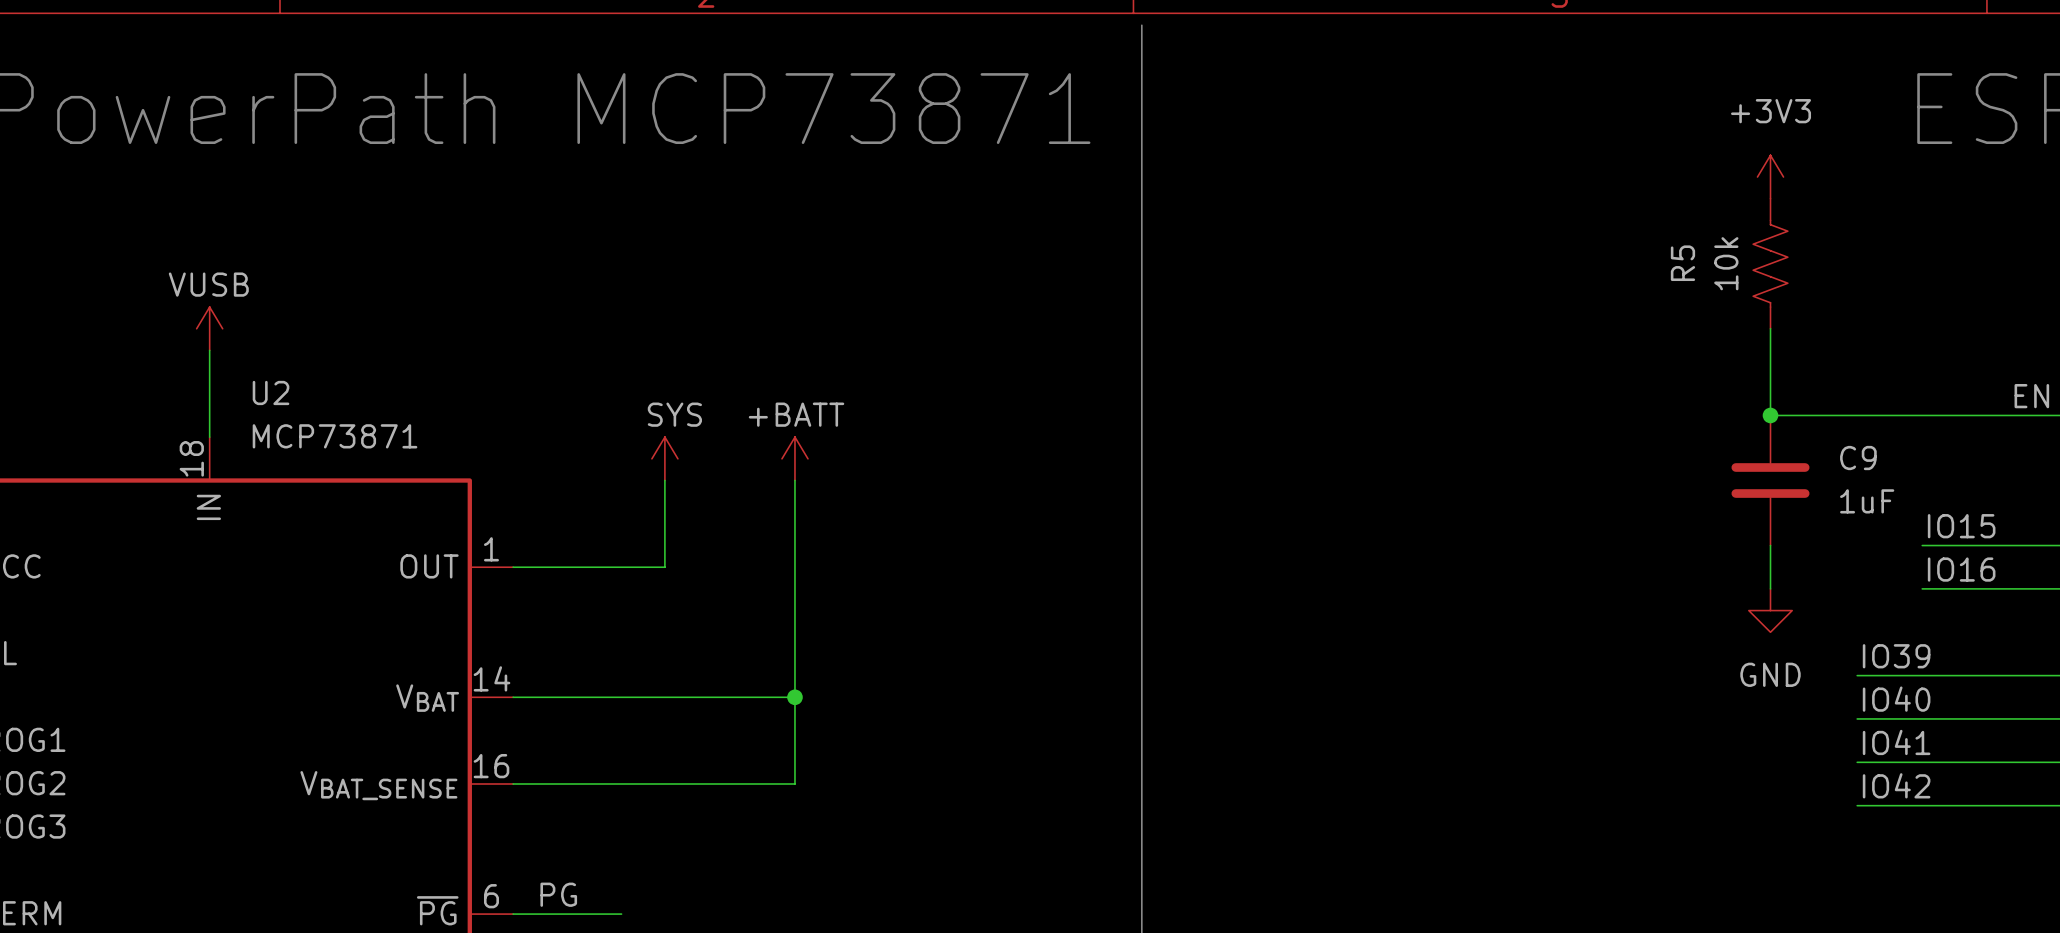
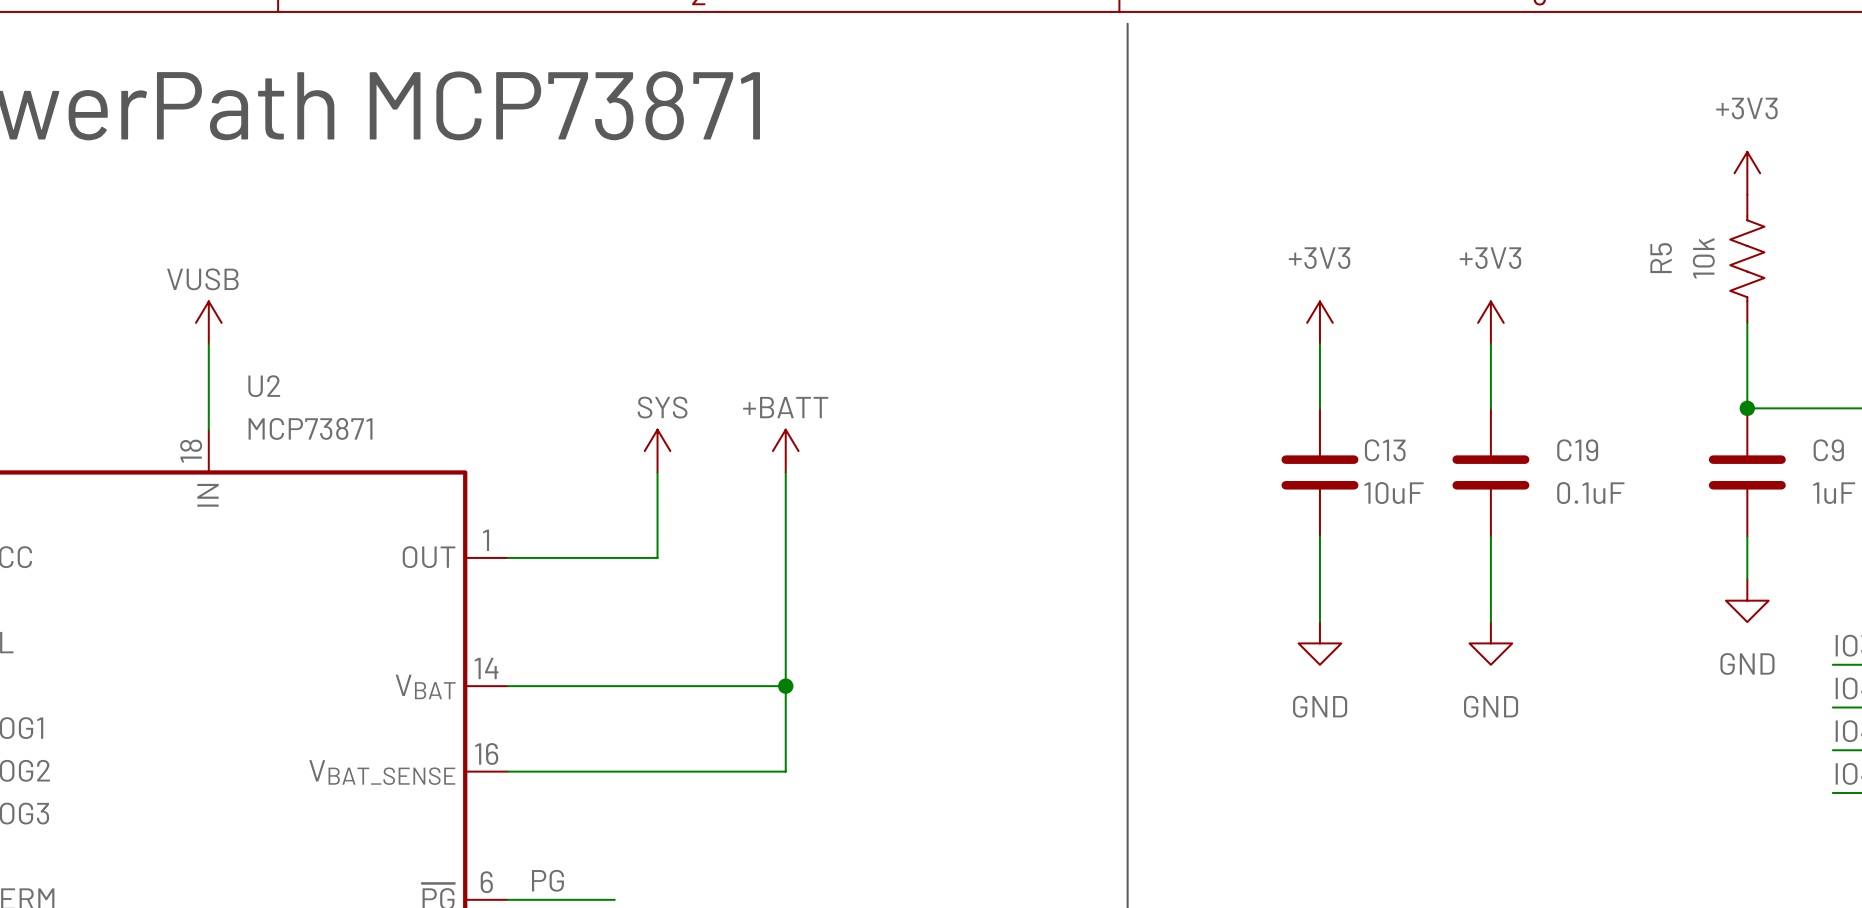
power symbol: none -> +3V3 (1319, 322)
power symbol: none -> +3V3 (1490, 322)
wire: none -> (1319, 344) (1319, 408)
wire: none -> (1490, 344) (1490, 408)
C13: none -> 10uF (1319, 472)
C19: none -> 0.1uF (1490, 472)
wire: none -> (1319, 536) (1319, 622)
wire: none -> (1490, 536) (1490, 622)
power symbol: none -> GND (1319, 643)
power symbol: none -> GND (1490, 643)

